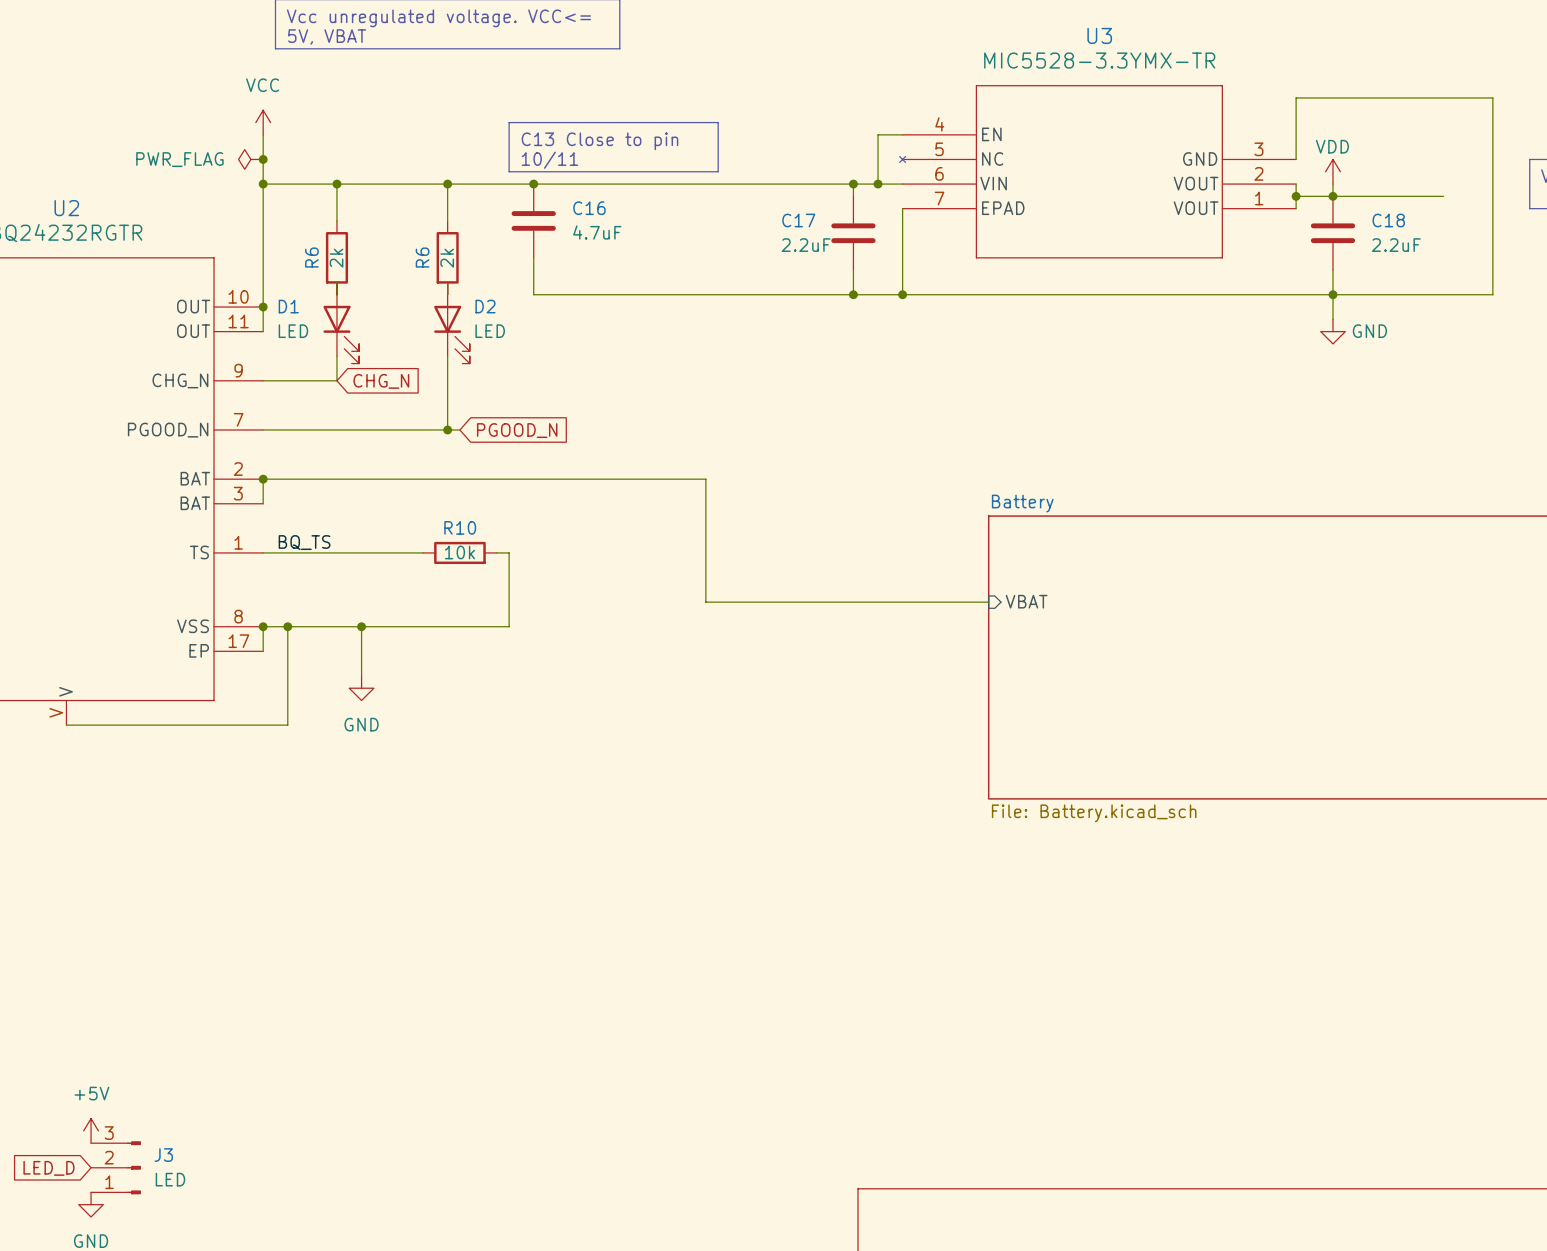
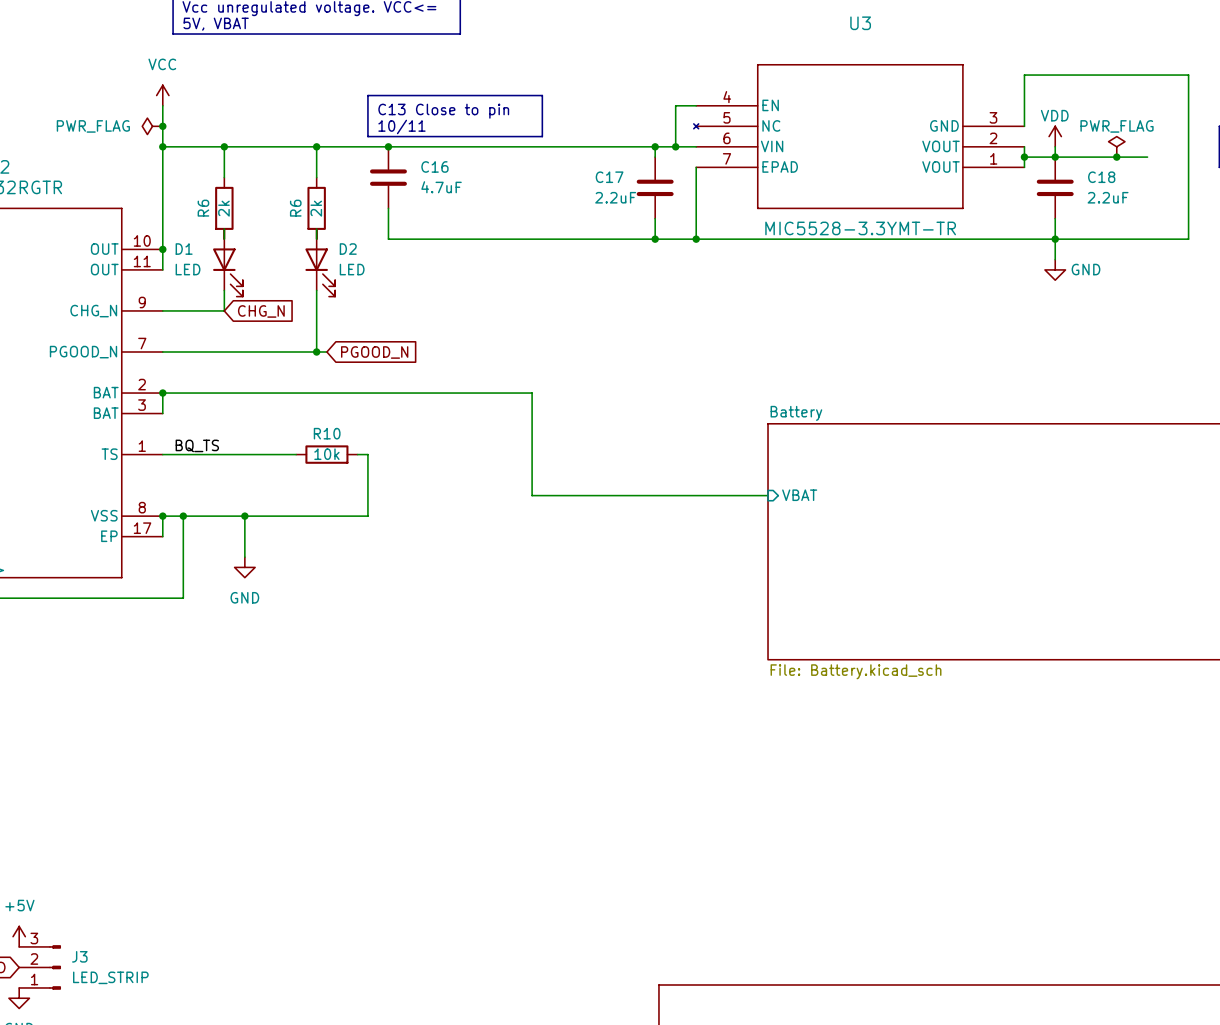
U3 value: MIC5528-3.3YMX-TR (1099, 60) -> MIC5528-3.3YMT-TR (860, 228)
power symbol: none -> PWR_FLAG (1116, 146)
junction: none -> (1116, 157)
J3 value: LED (170, 1179) -> LED_STRIP (110, 977)

